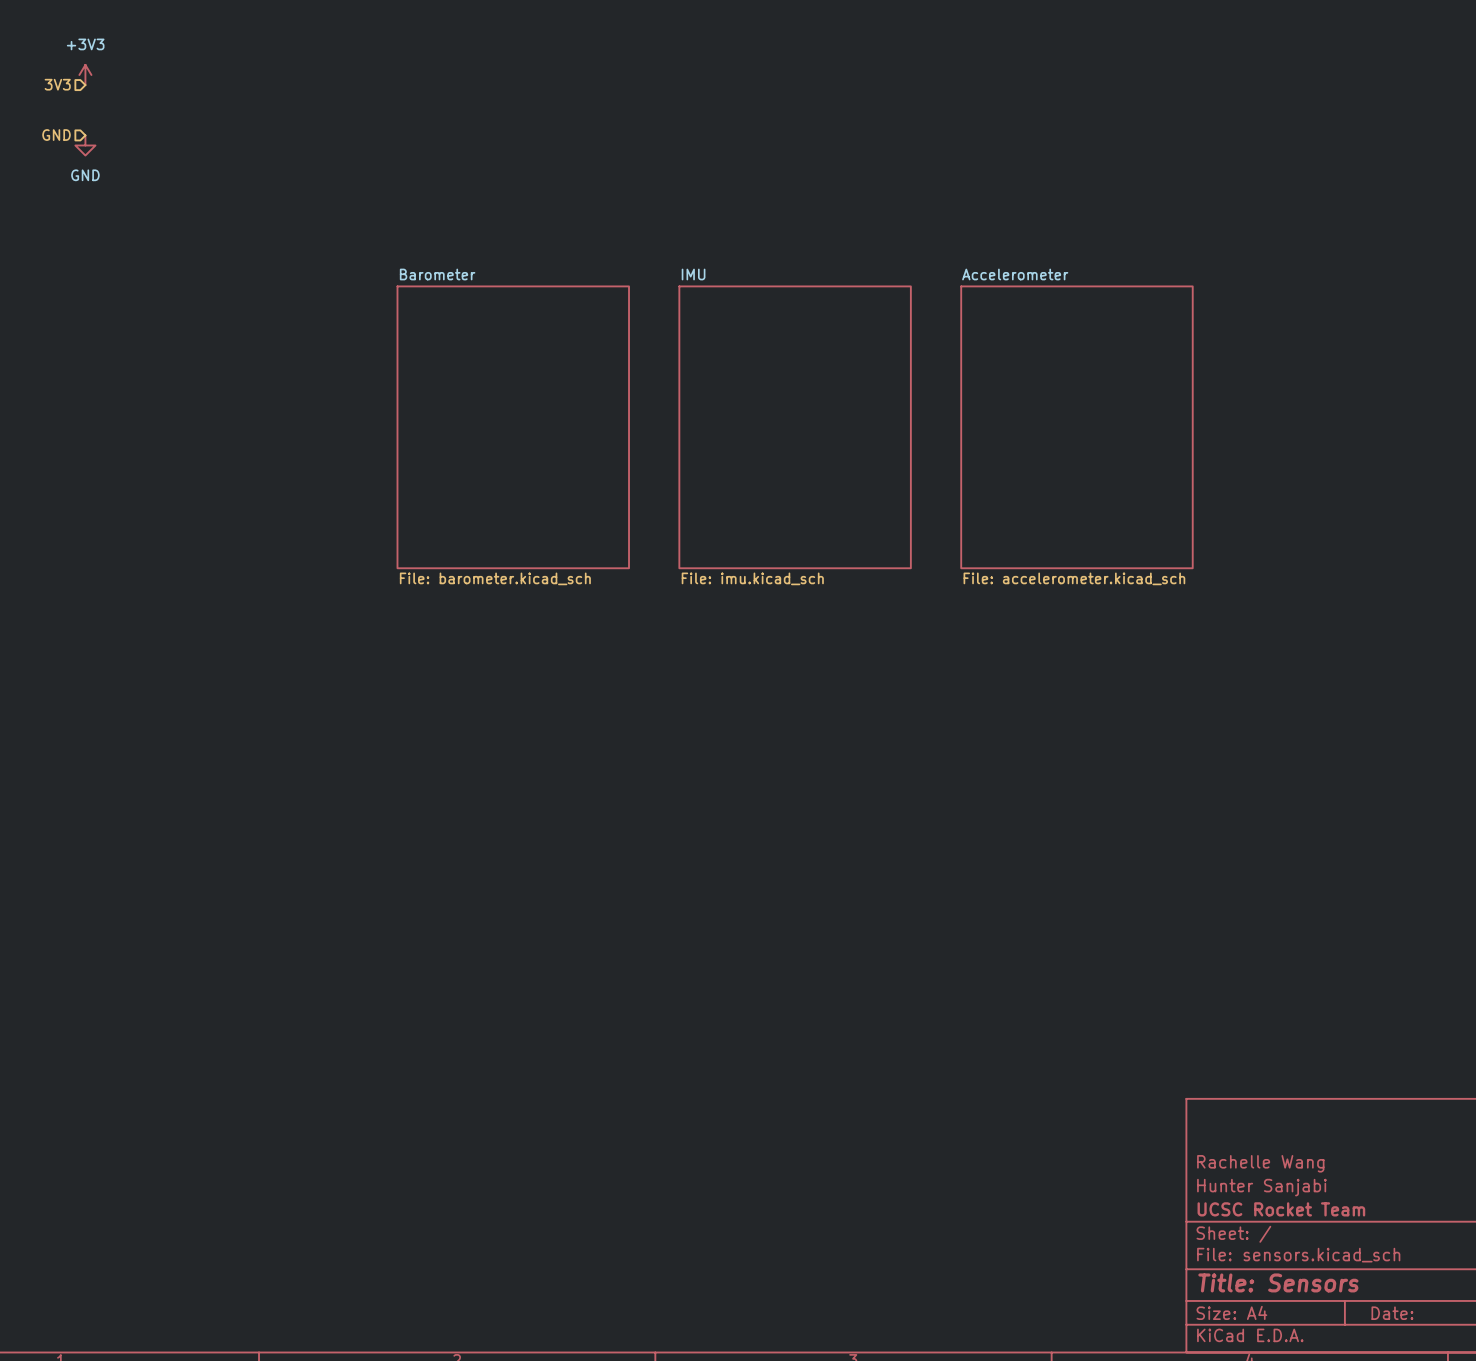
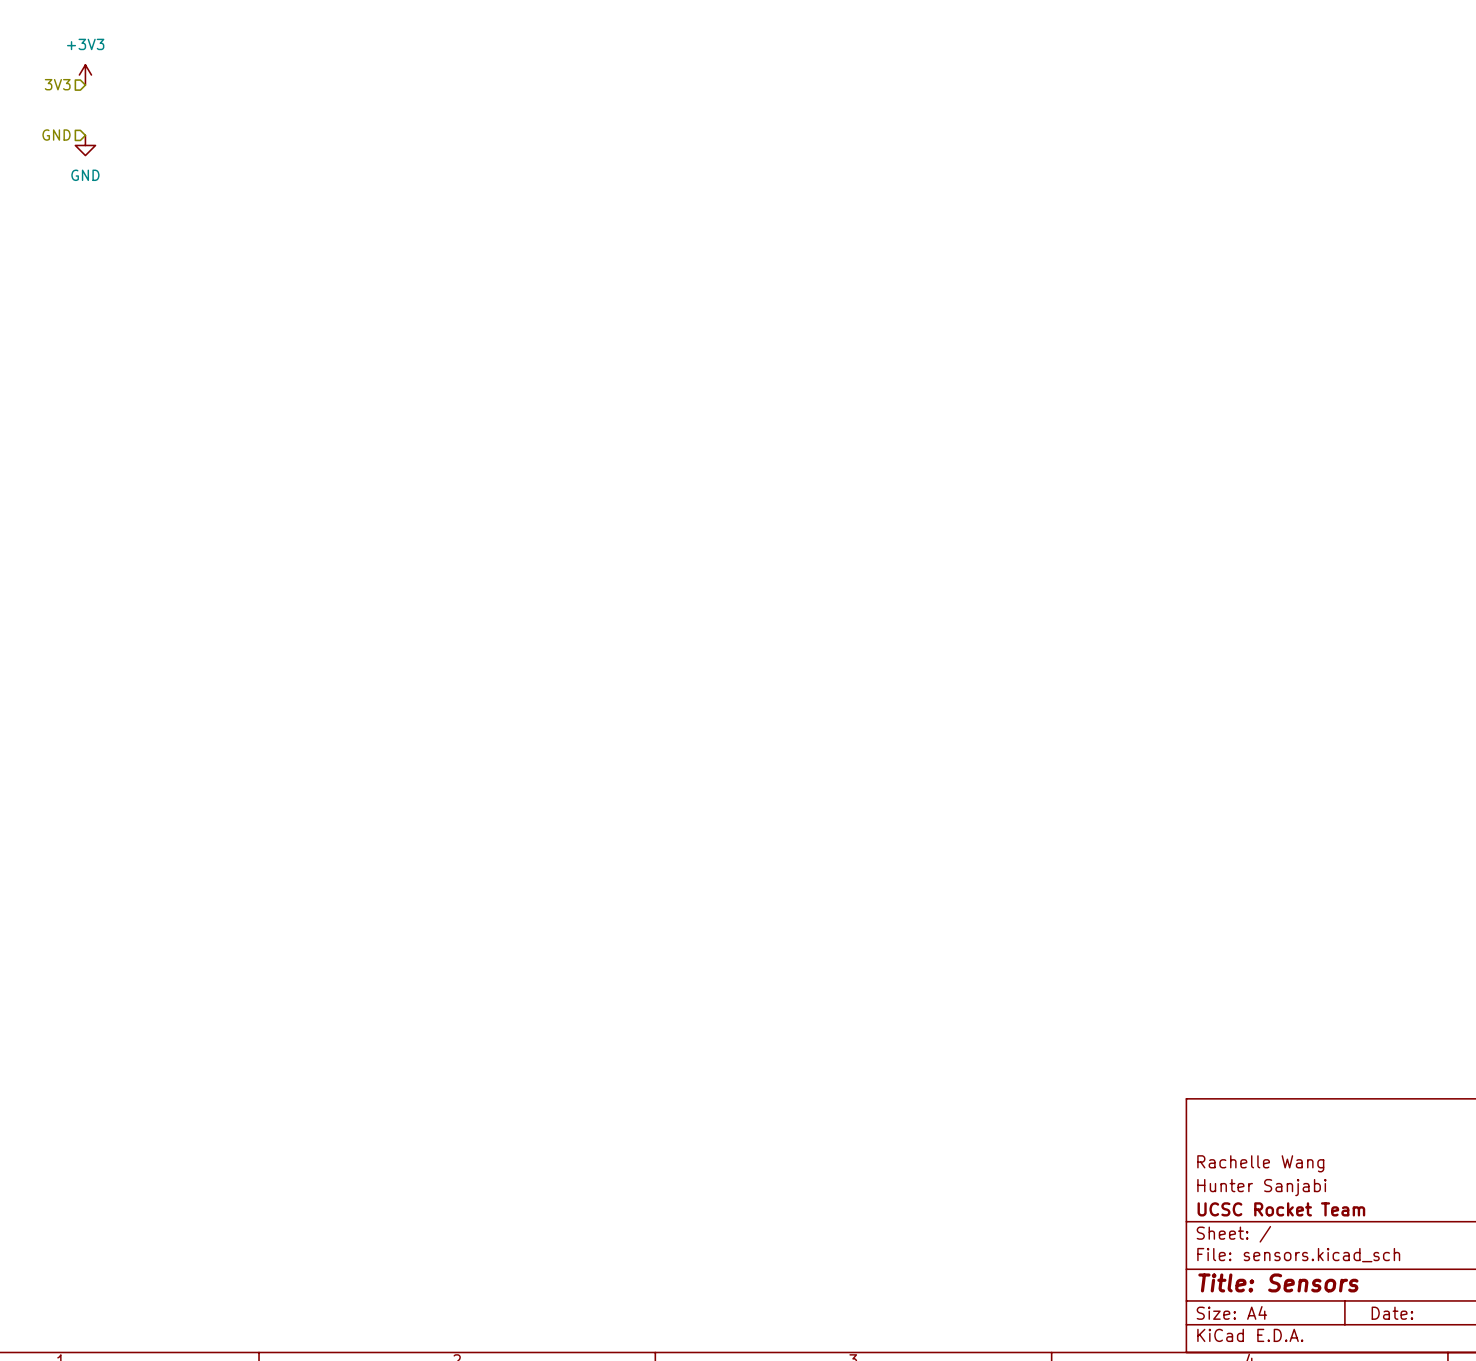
sheet Barometer: File: barometer.kicad_sch (513, 427) -> none
sheet IMU: File: imu.kicad_sch (795, 427) -> none
sheet Accelerometer: File: accelerometer.kicad_sch (1076, 427) -> none

